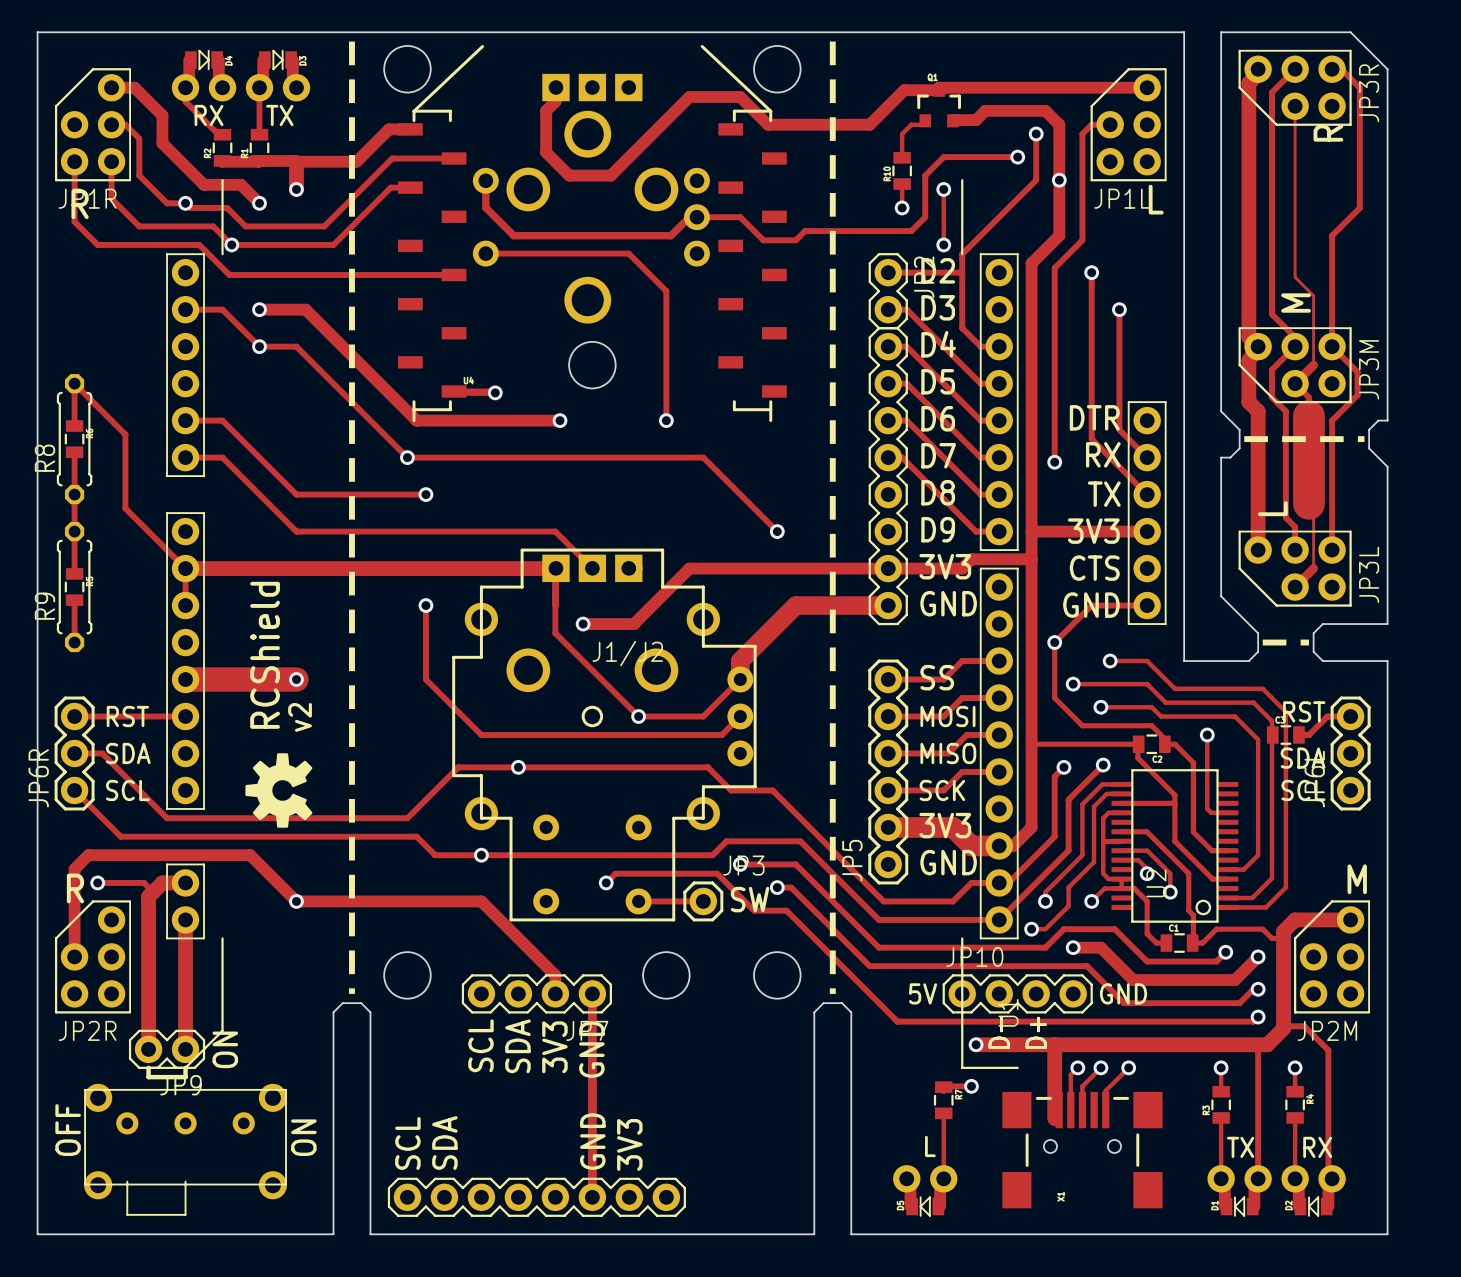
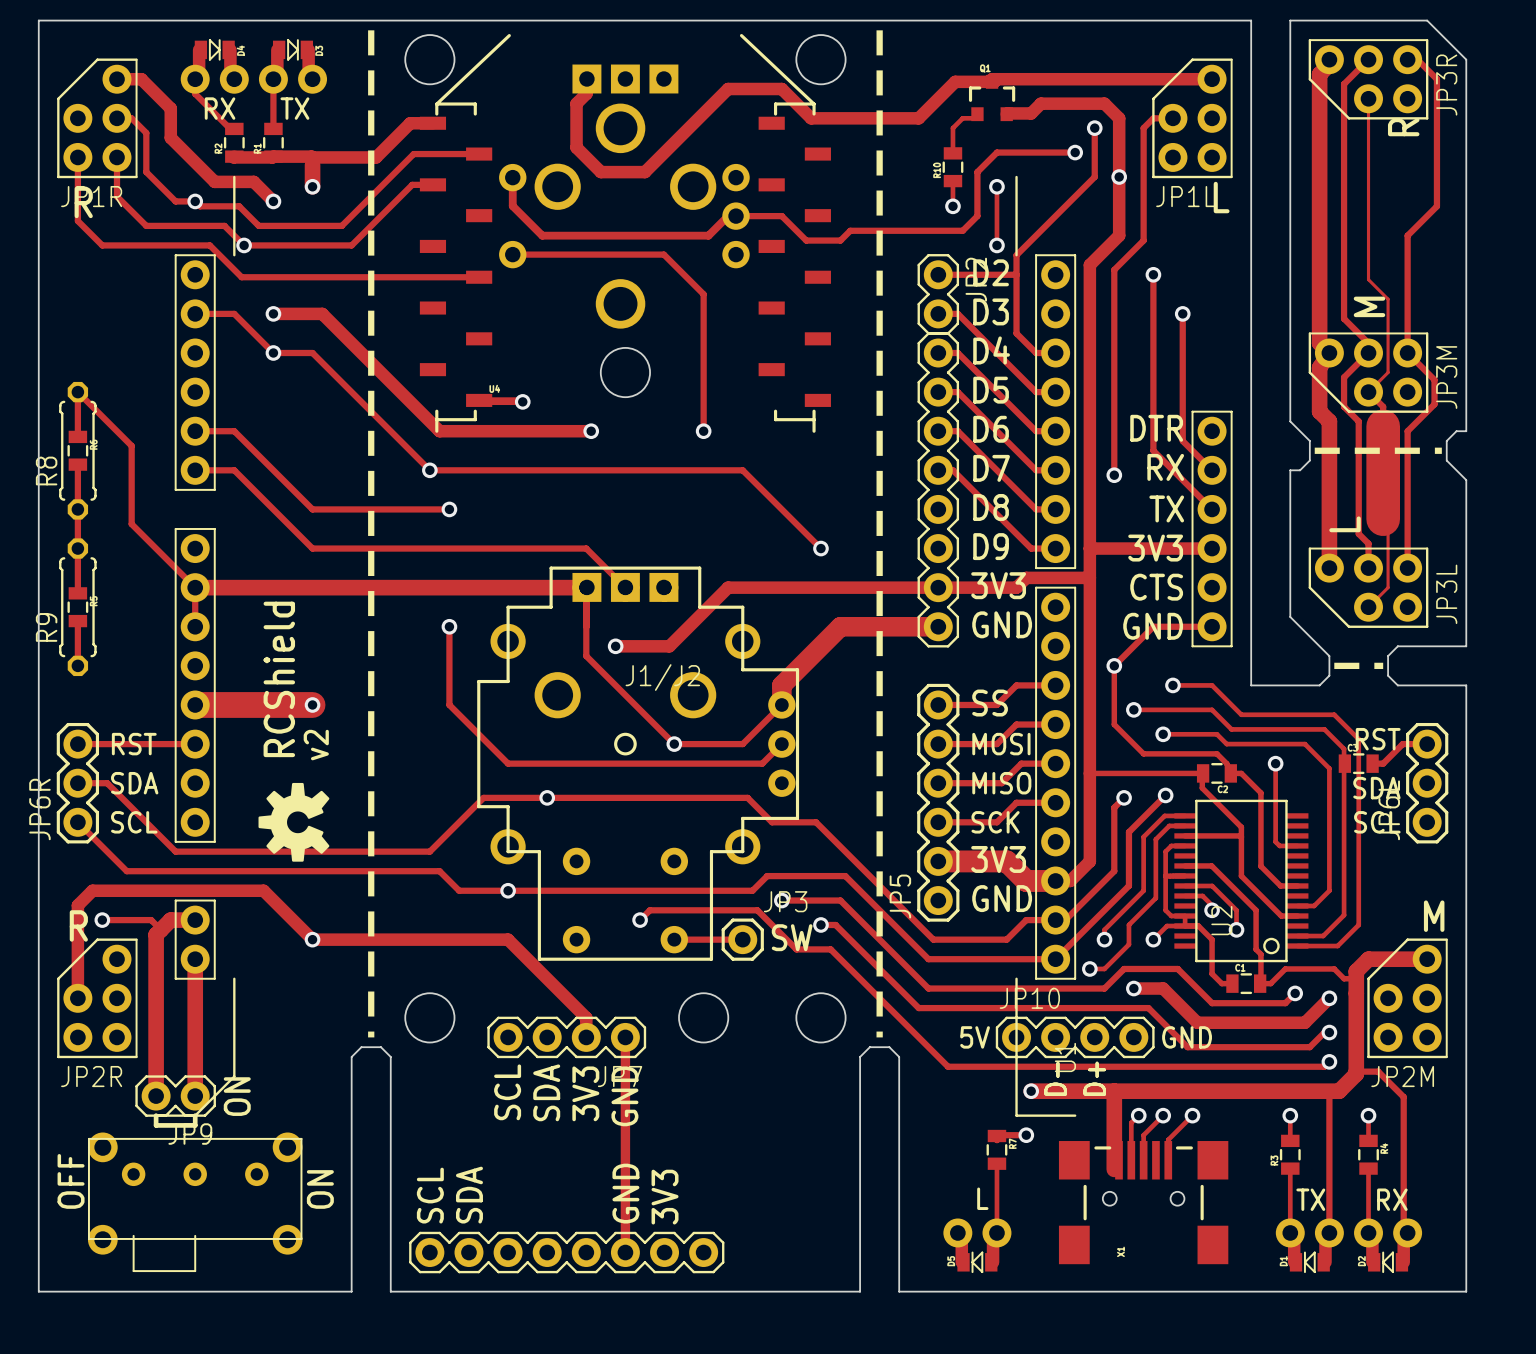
track width: thick (1313, 365) (1295, 383) -> thin (1388, 372) (1368, 392)
track width: thick (1313, 568) (1295, 587) -> thin (1388, 587) (1368, 607)

